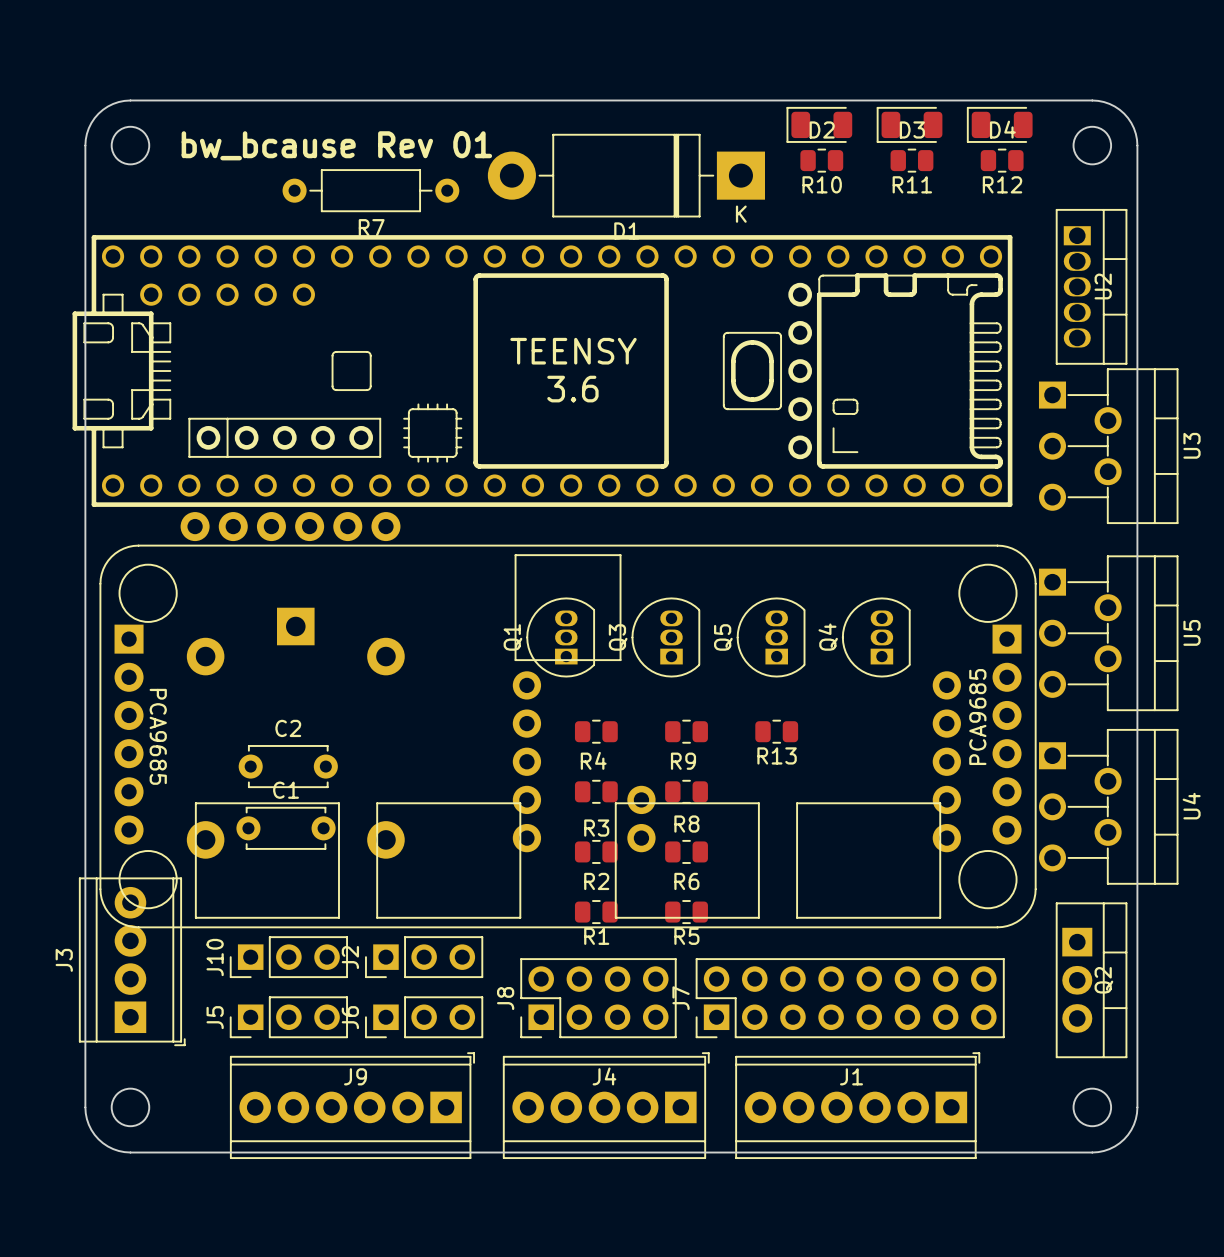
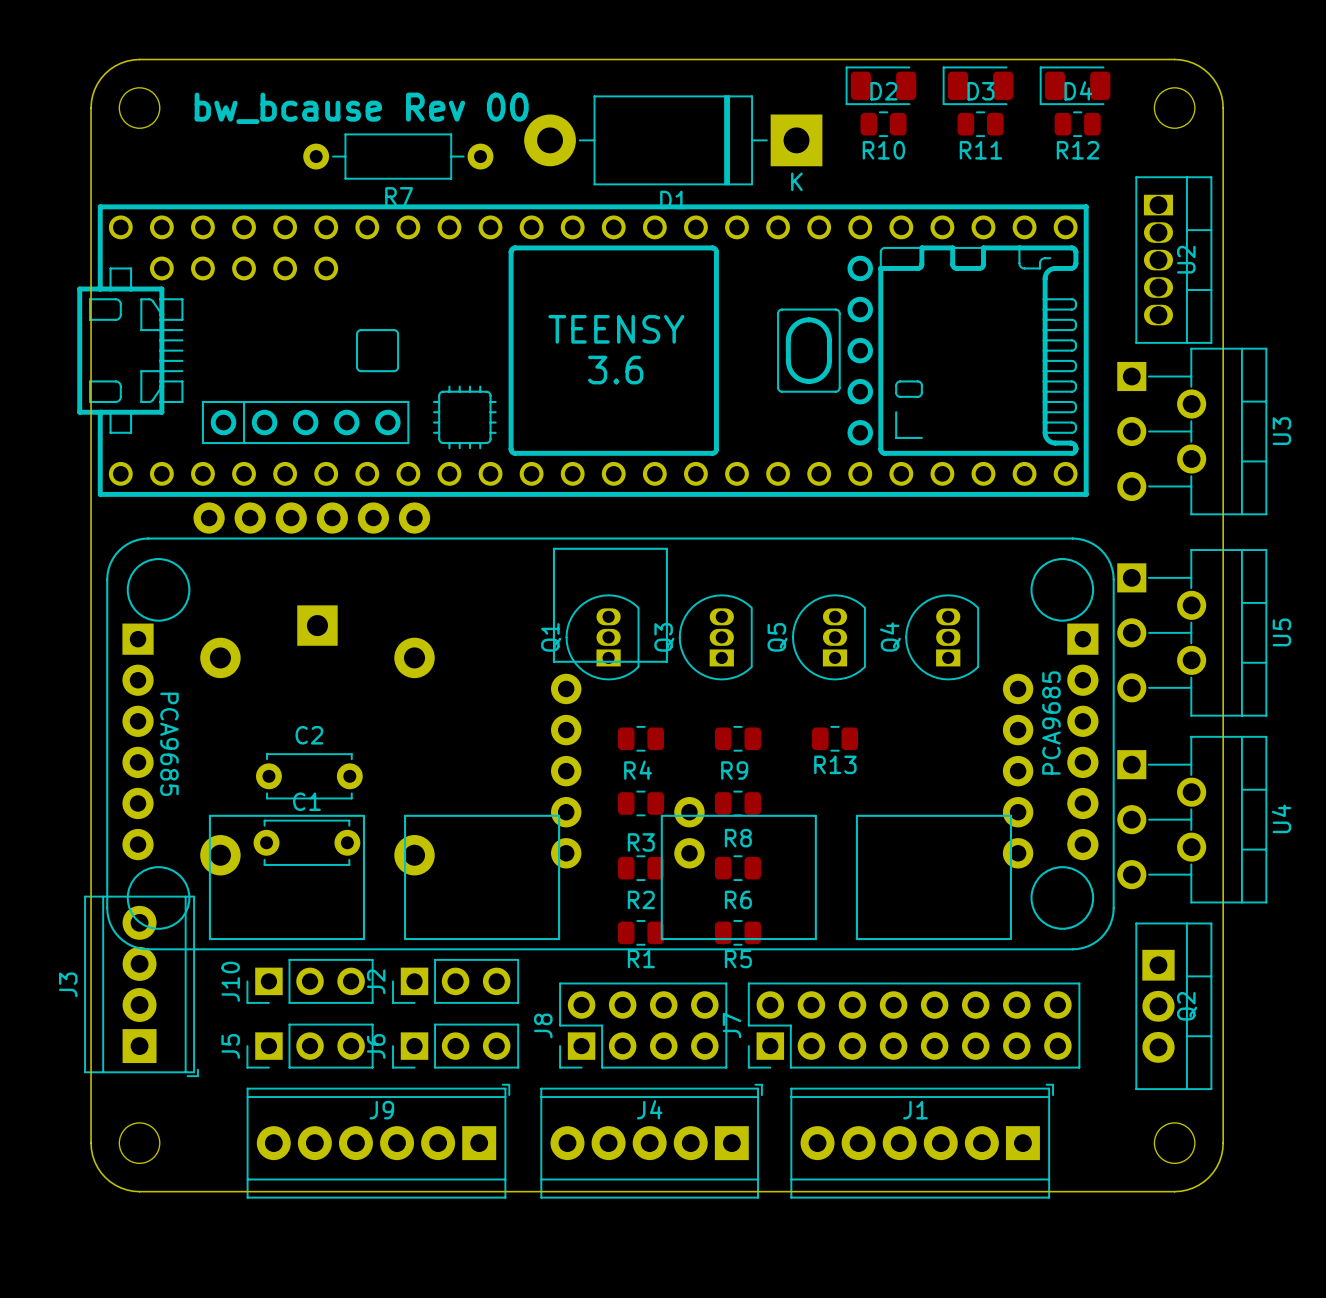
text: bw_bcause Rev 01 (336, 145) -> bw_bcause Rev 00 (361, 108)

